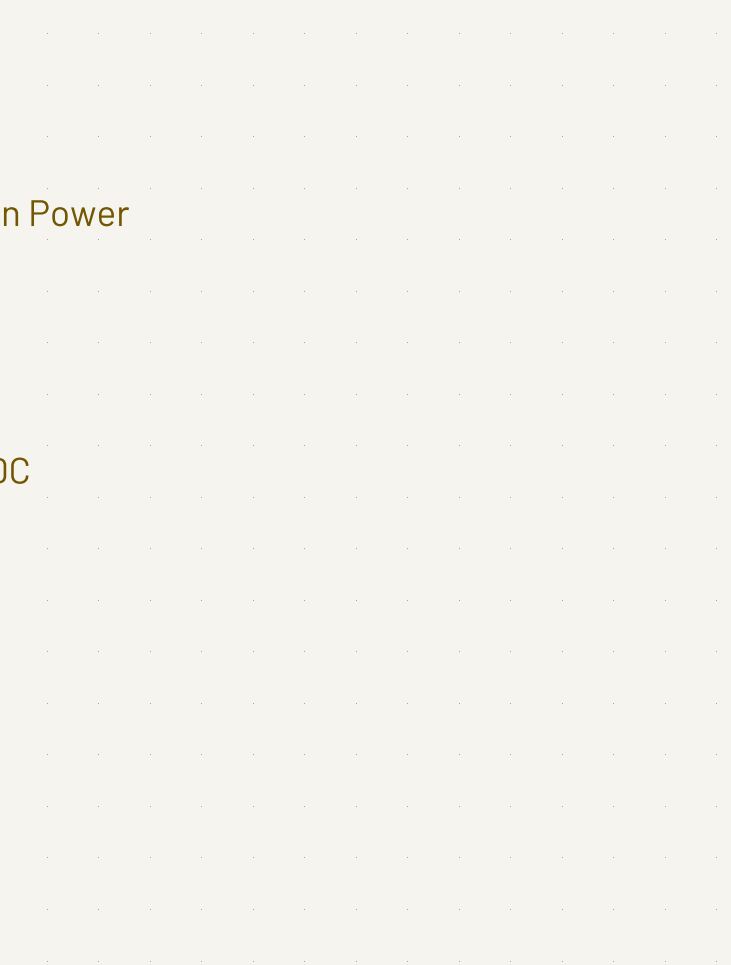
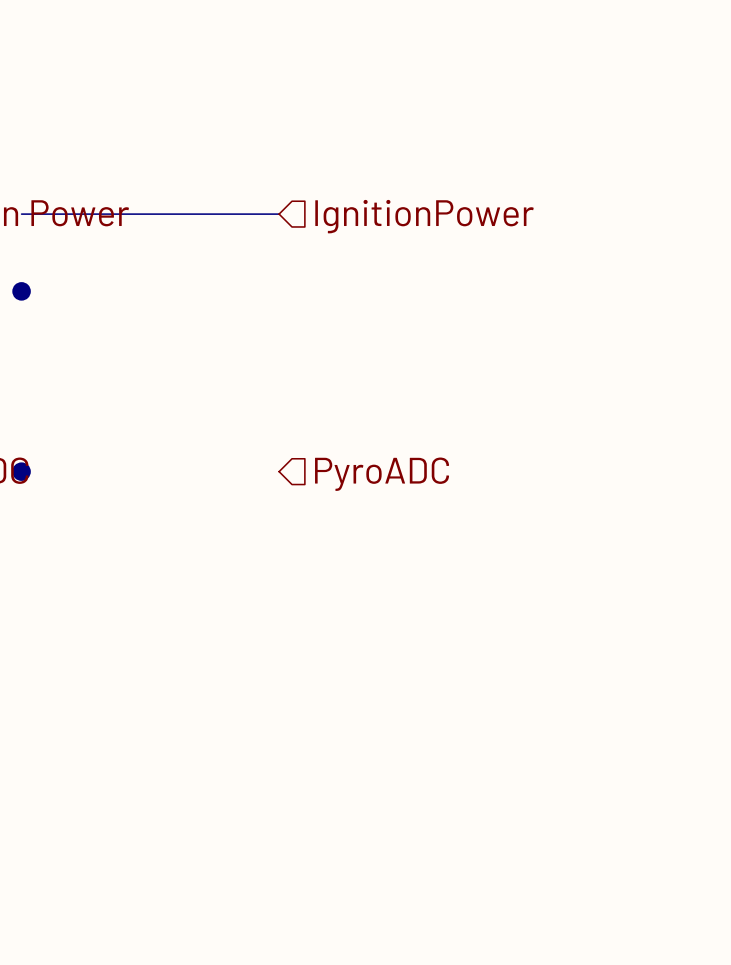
wire: none -> (21, 214) (279, 214)
hierarchical label: none -> IgnitionPower (424, 216)
junction: none -> (21, 291)
junction: none -> (21, 471)
hierarchical label: none -> PyroADC (382, 474)

